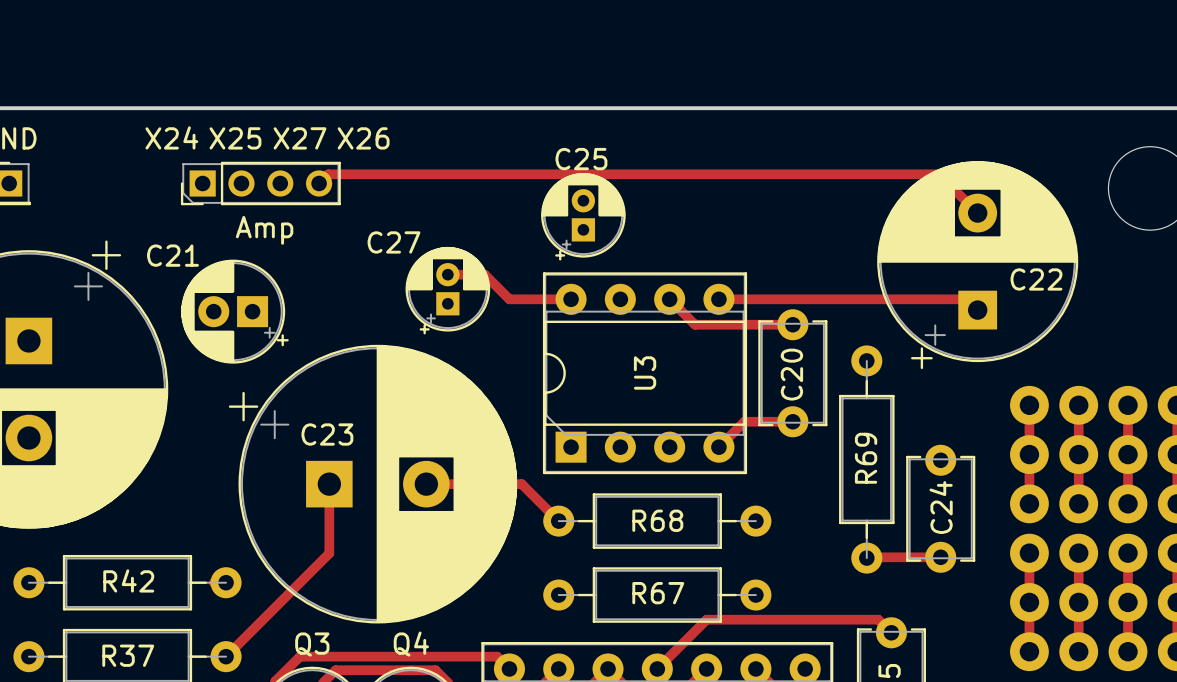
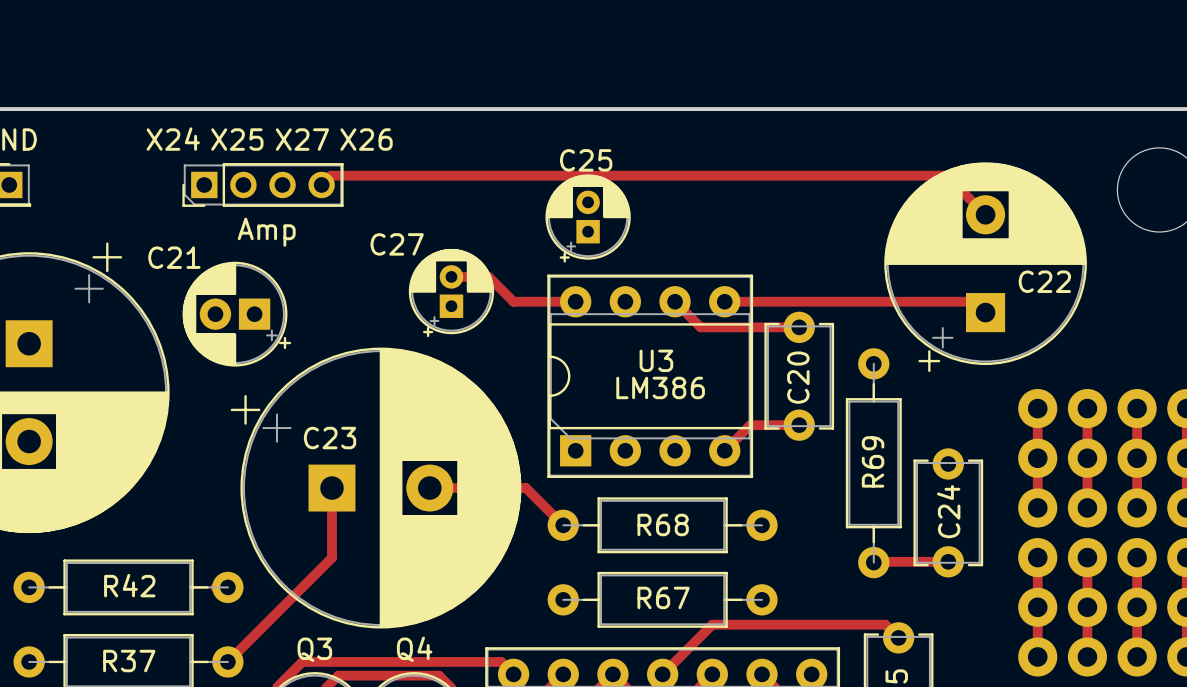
U3 name rotation: 0° (645, 372) -> 90° clockwise (656, 360)
U3 value: none -> LM386 (660, 387)

